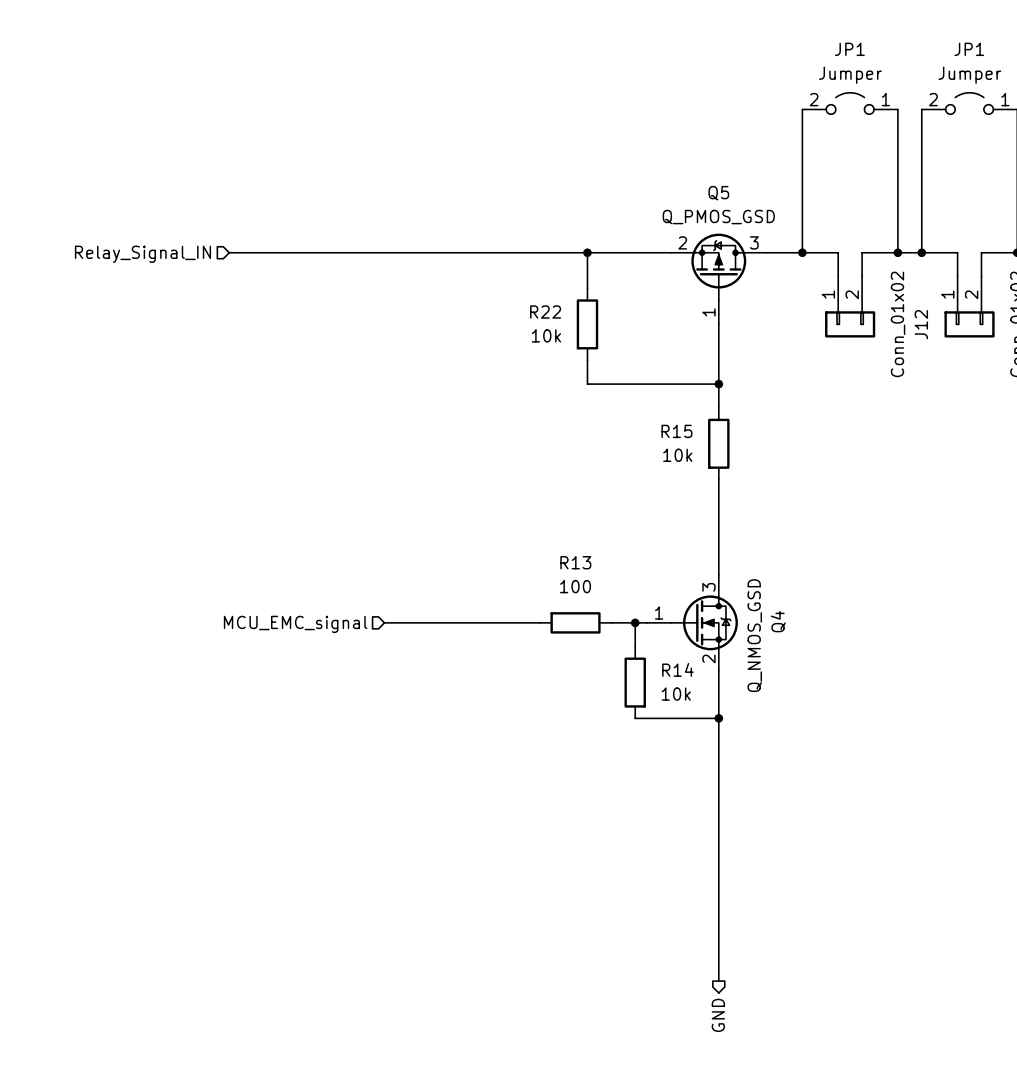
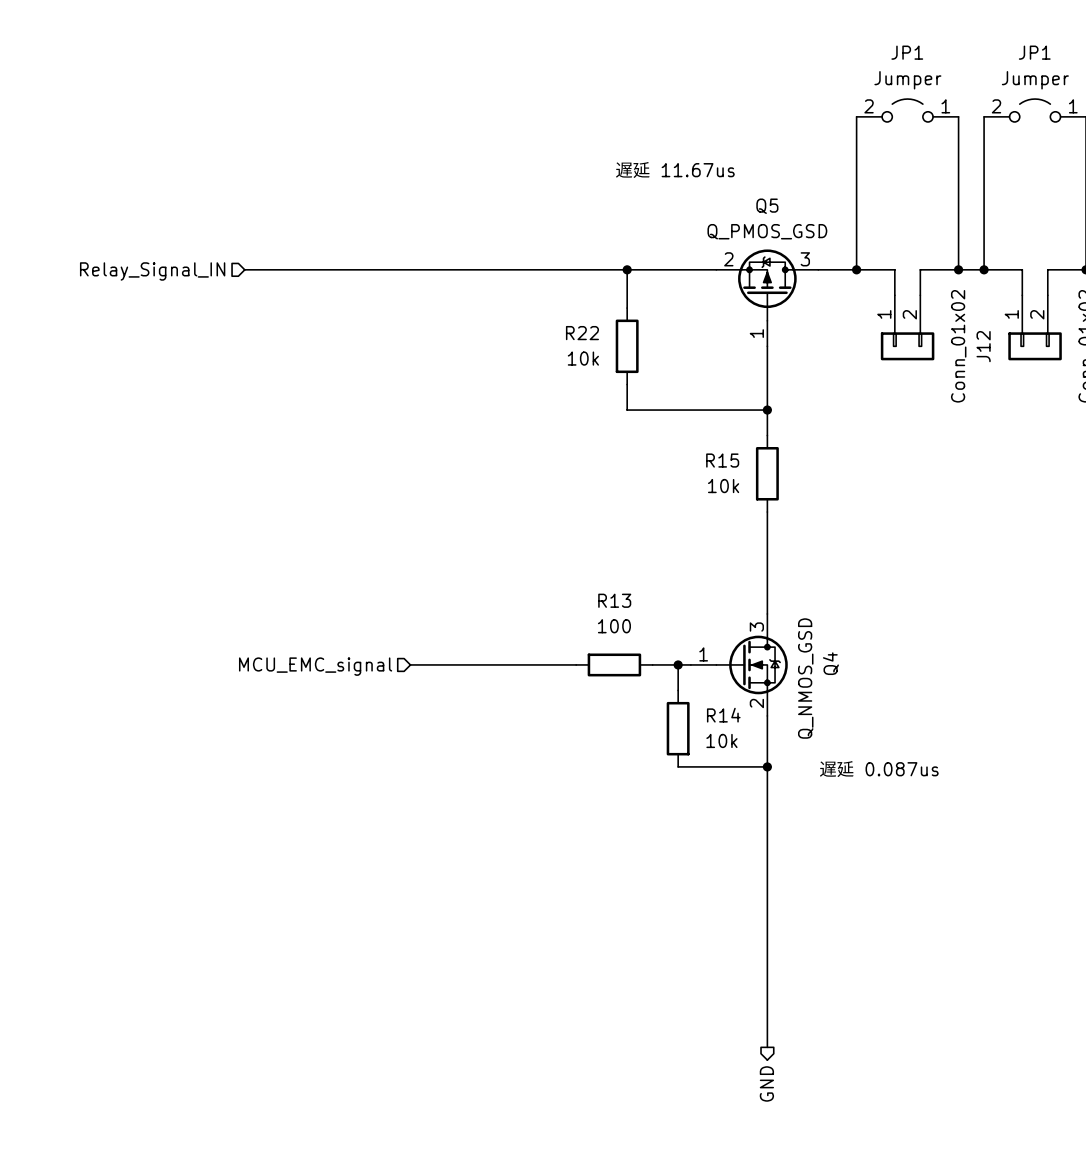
text: none -> 遅延 11.67us (675, 170)
text: none -> 遅延 0.087us (878, 769)

